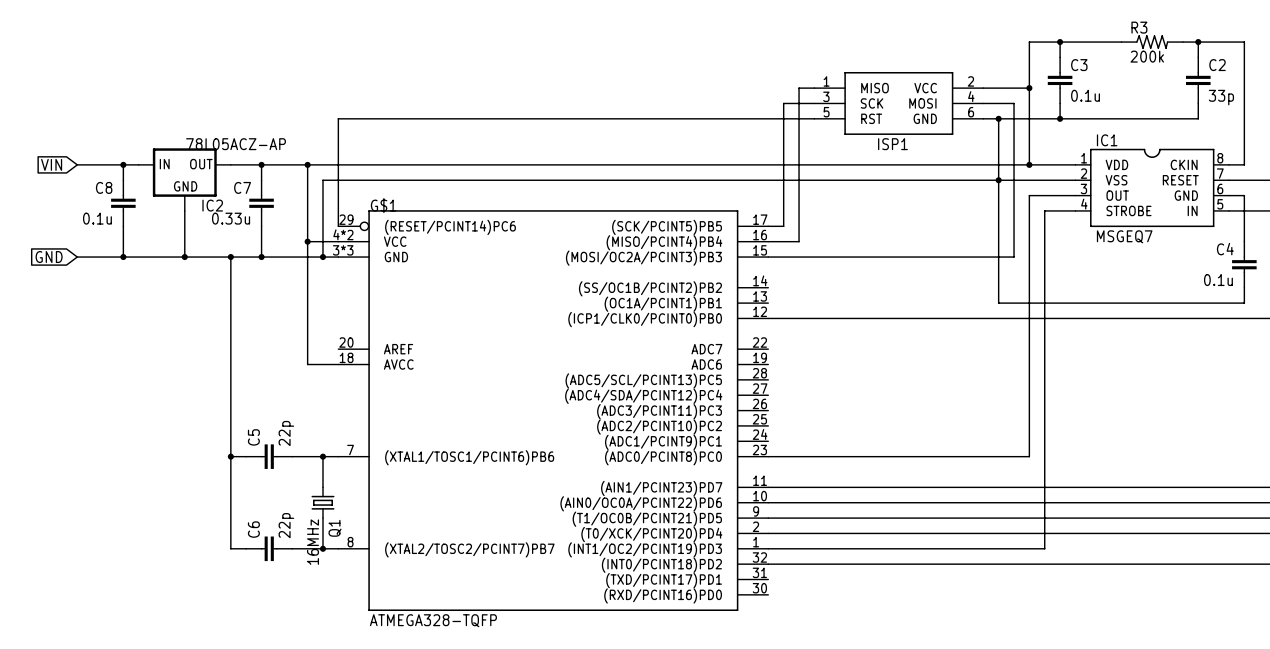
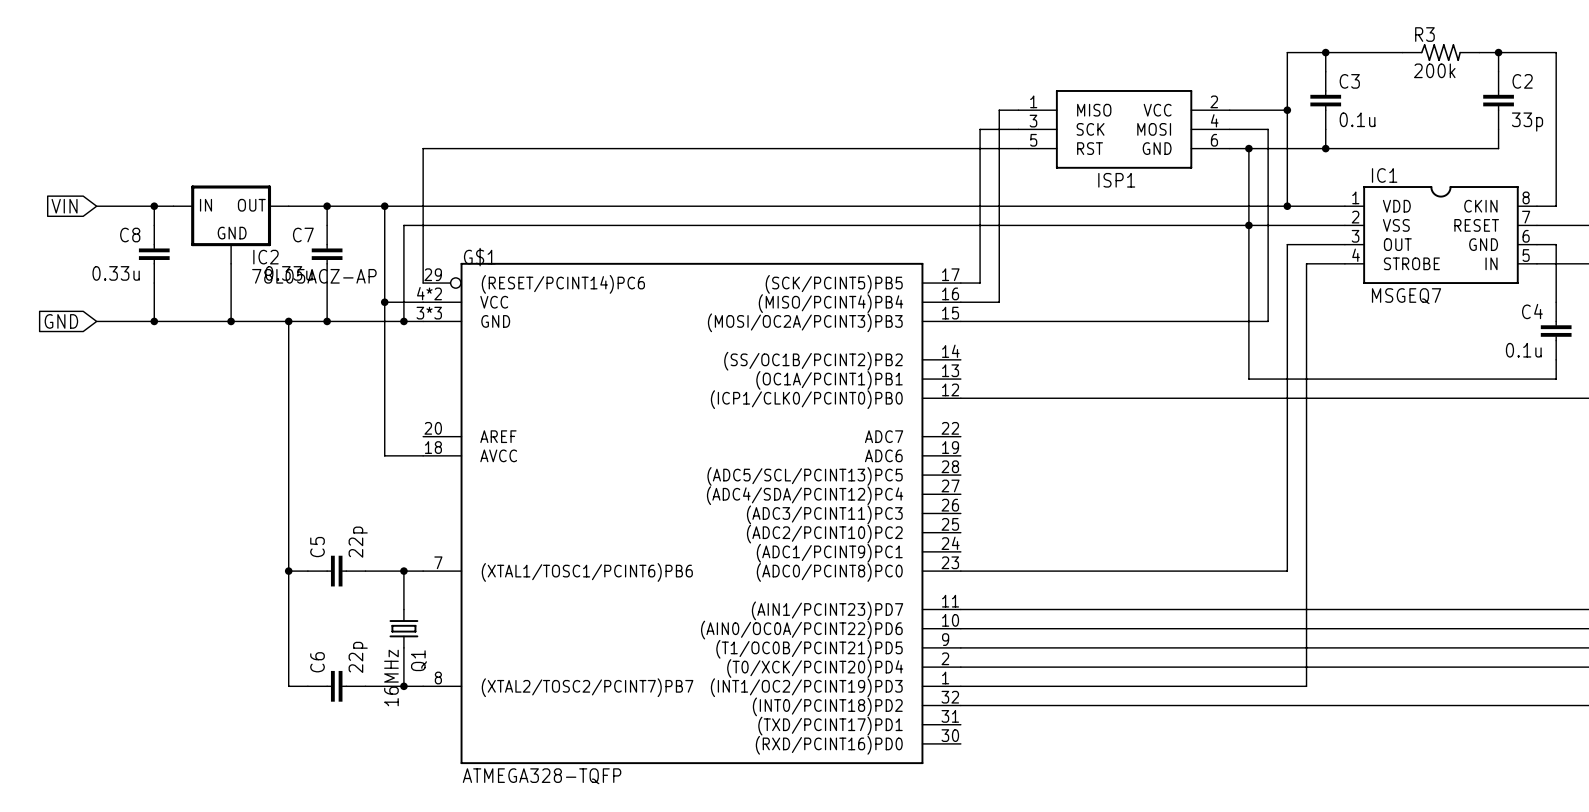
IC2 value position: 78L05ACZ-AP (236, 144) -> 78L05ACZ-AP (314, 276)
C8 value: 0.1u (97, 218) -> 0.33u (116, 273)

